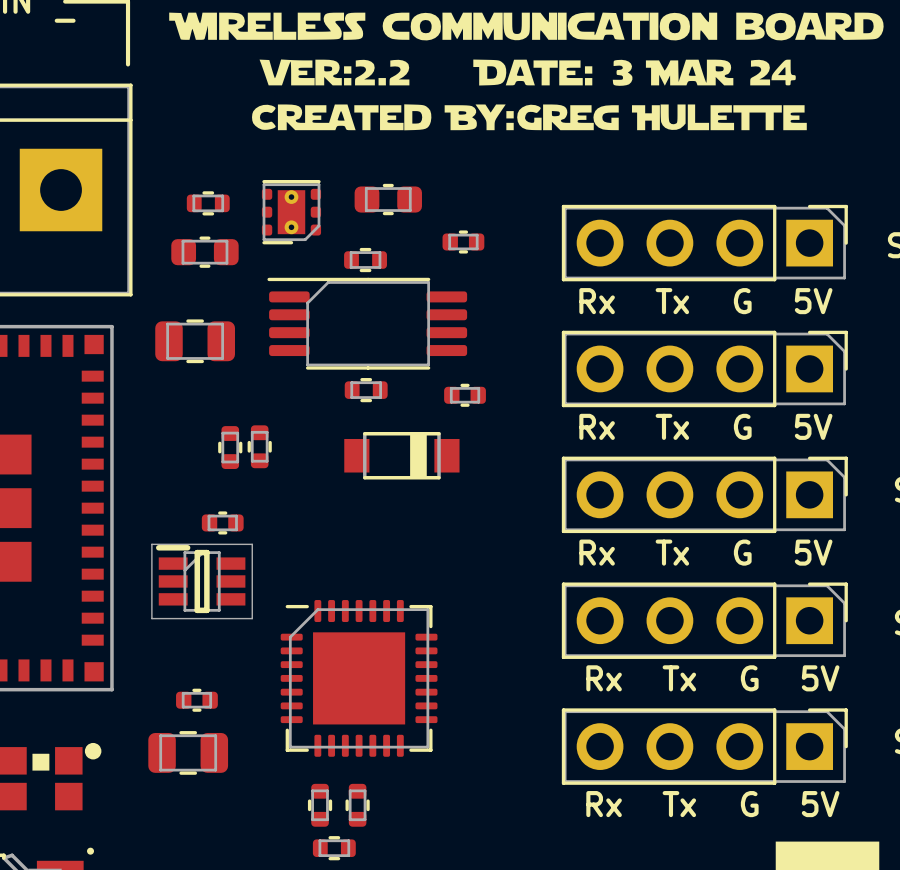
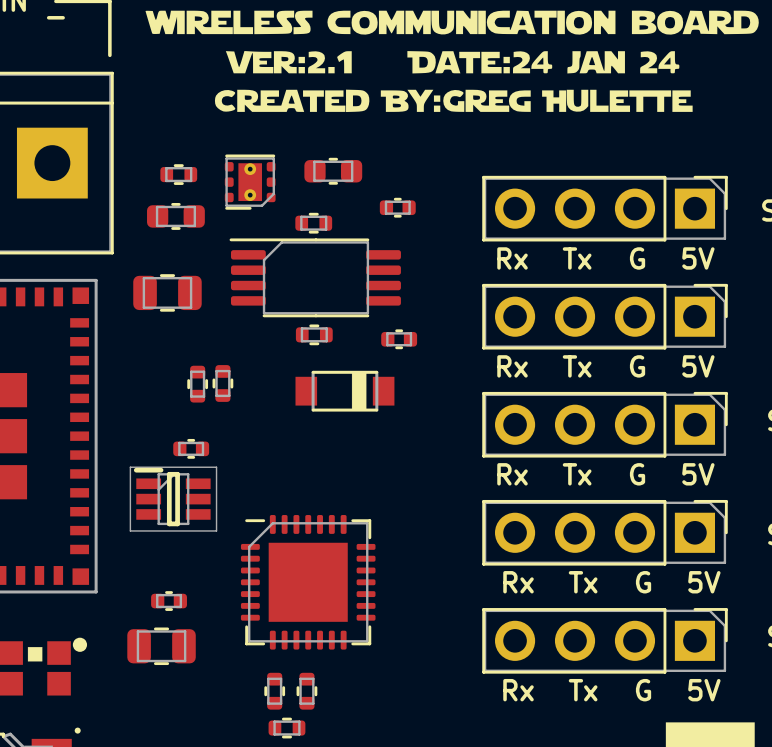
drawing shape: [169, 12, 884, 131] -> [145, 10, 759, 113]

